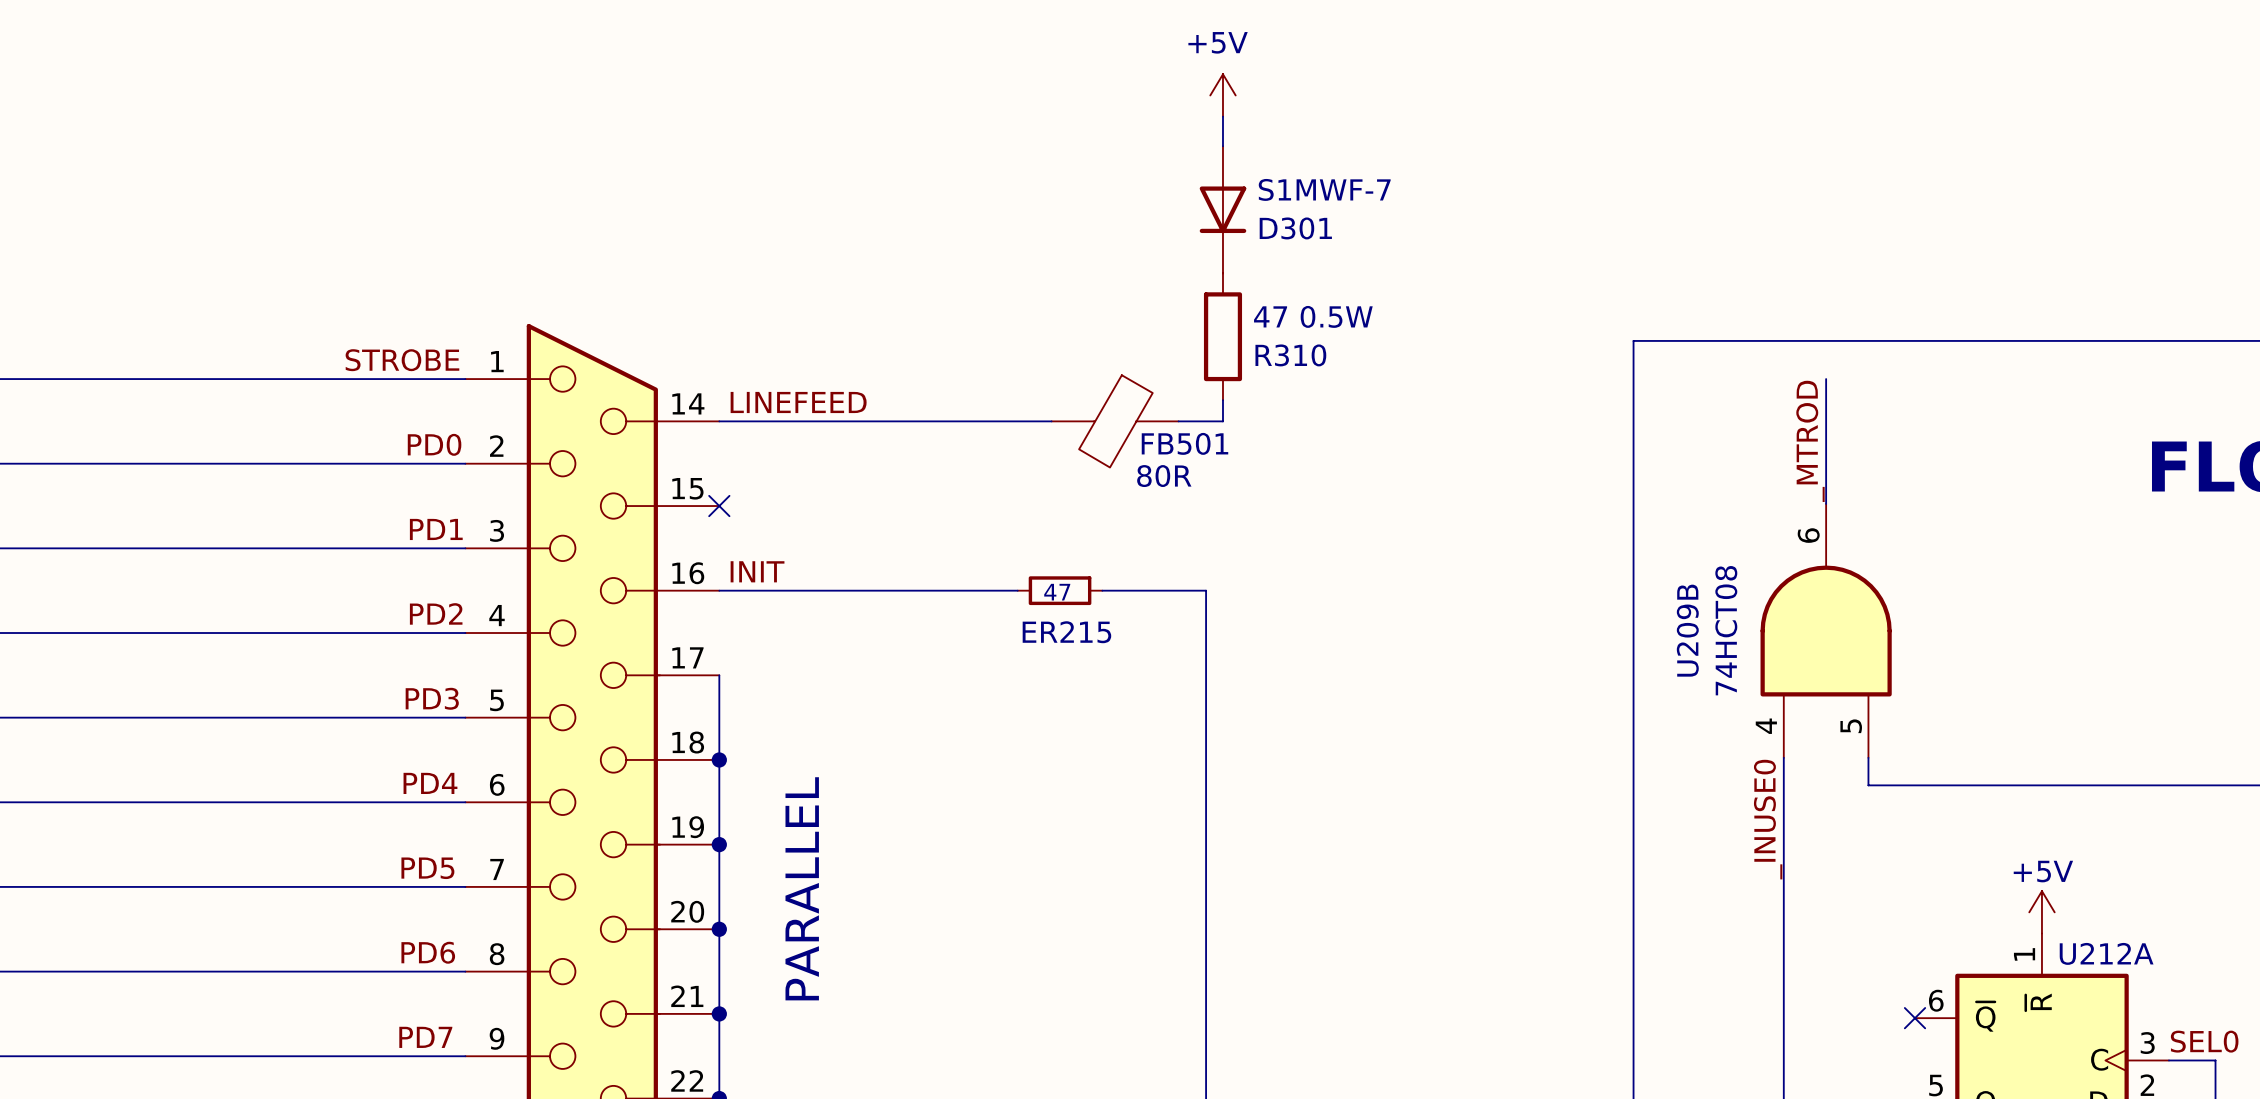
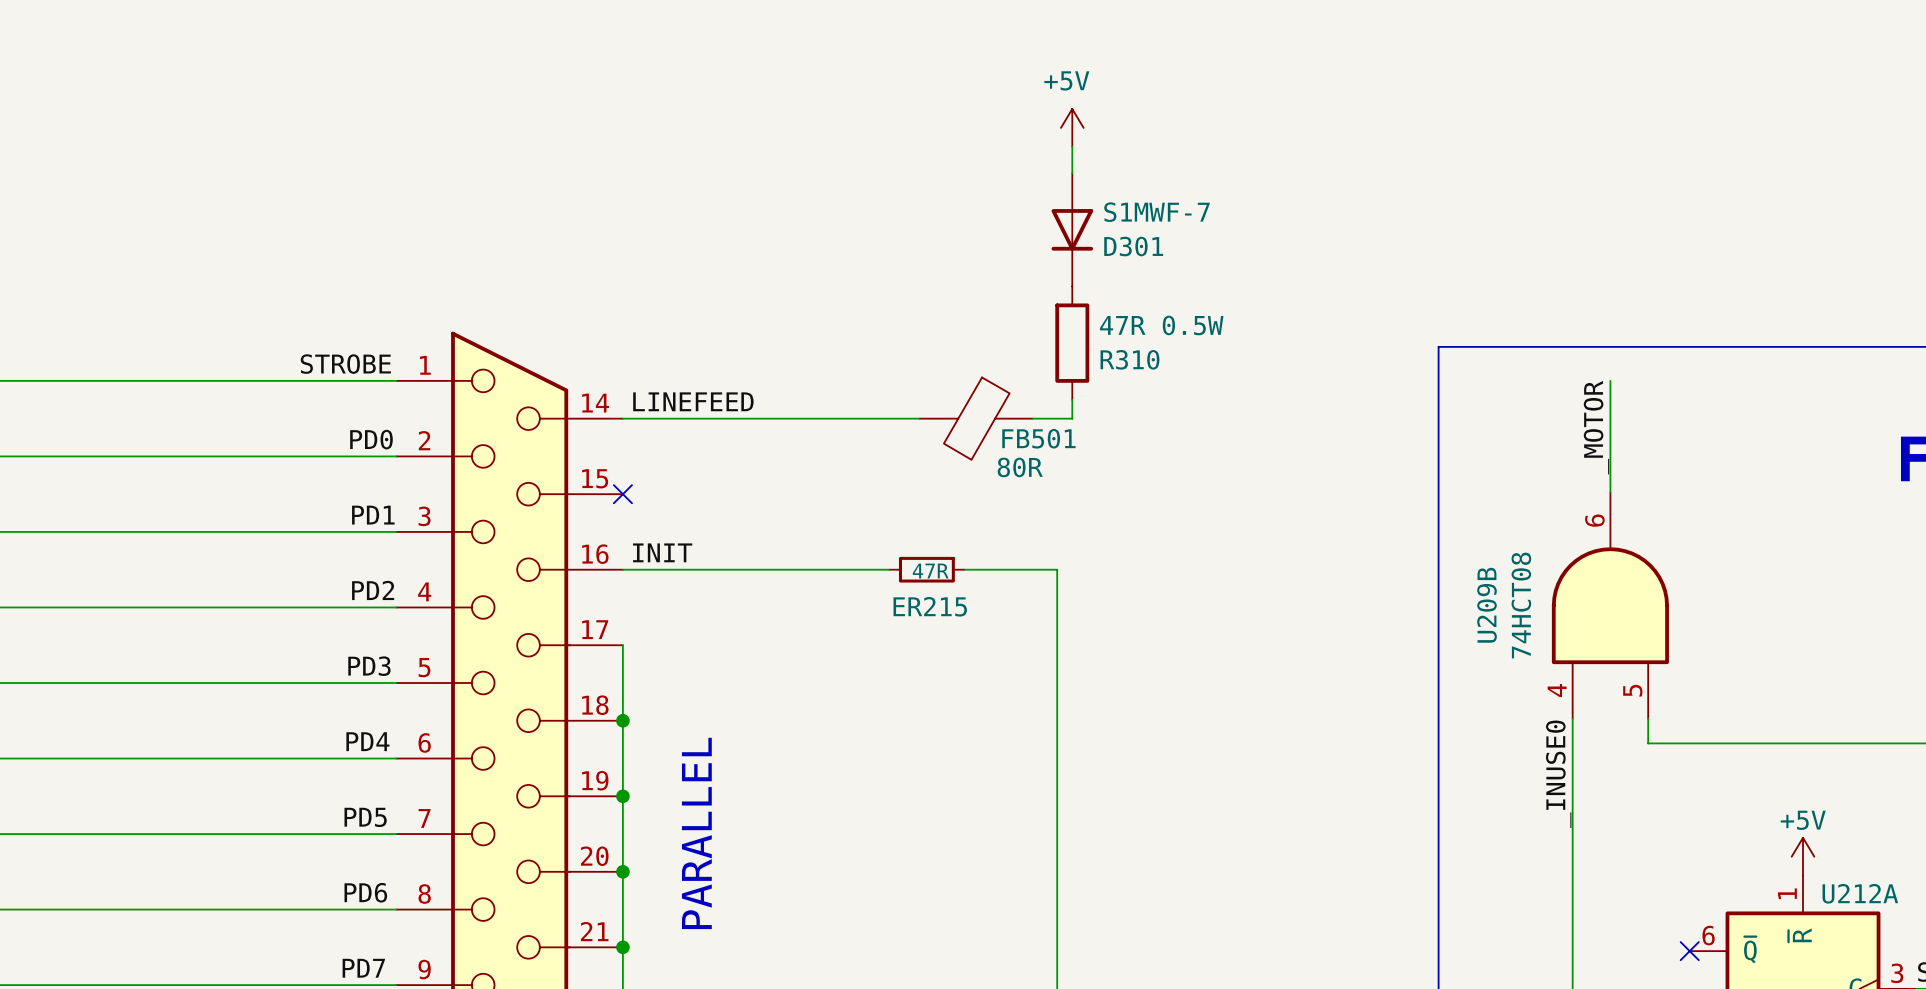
R310 value: 47 0.5W (1313, 316) -> 47R 0.5W (1161, 325)
label: _MTROD (1810, 441) -> _MOTOR (1596, 427)
ER215 value: 47 (1057, 592) -> 47R (930, 571)

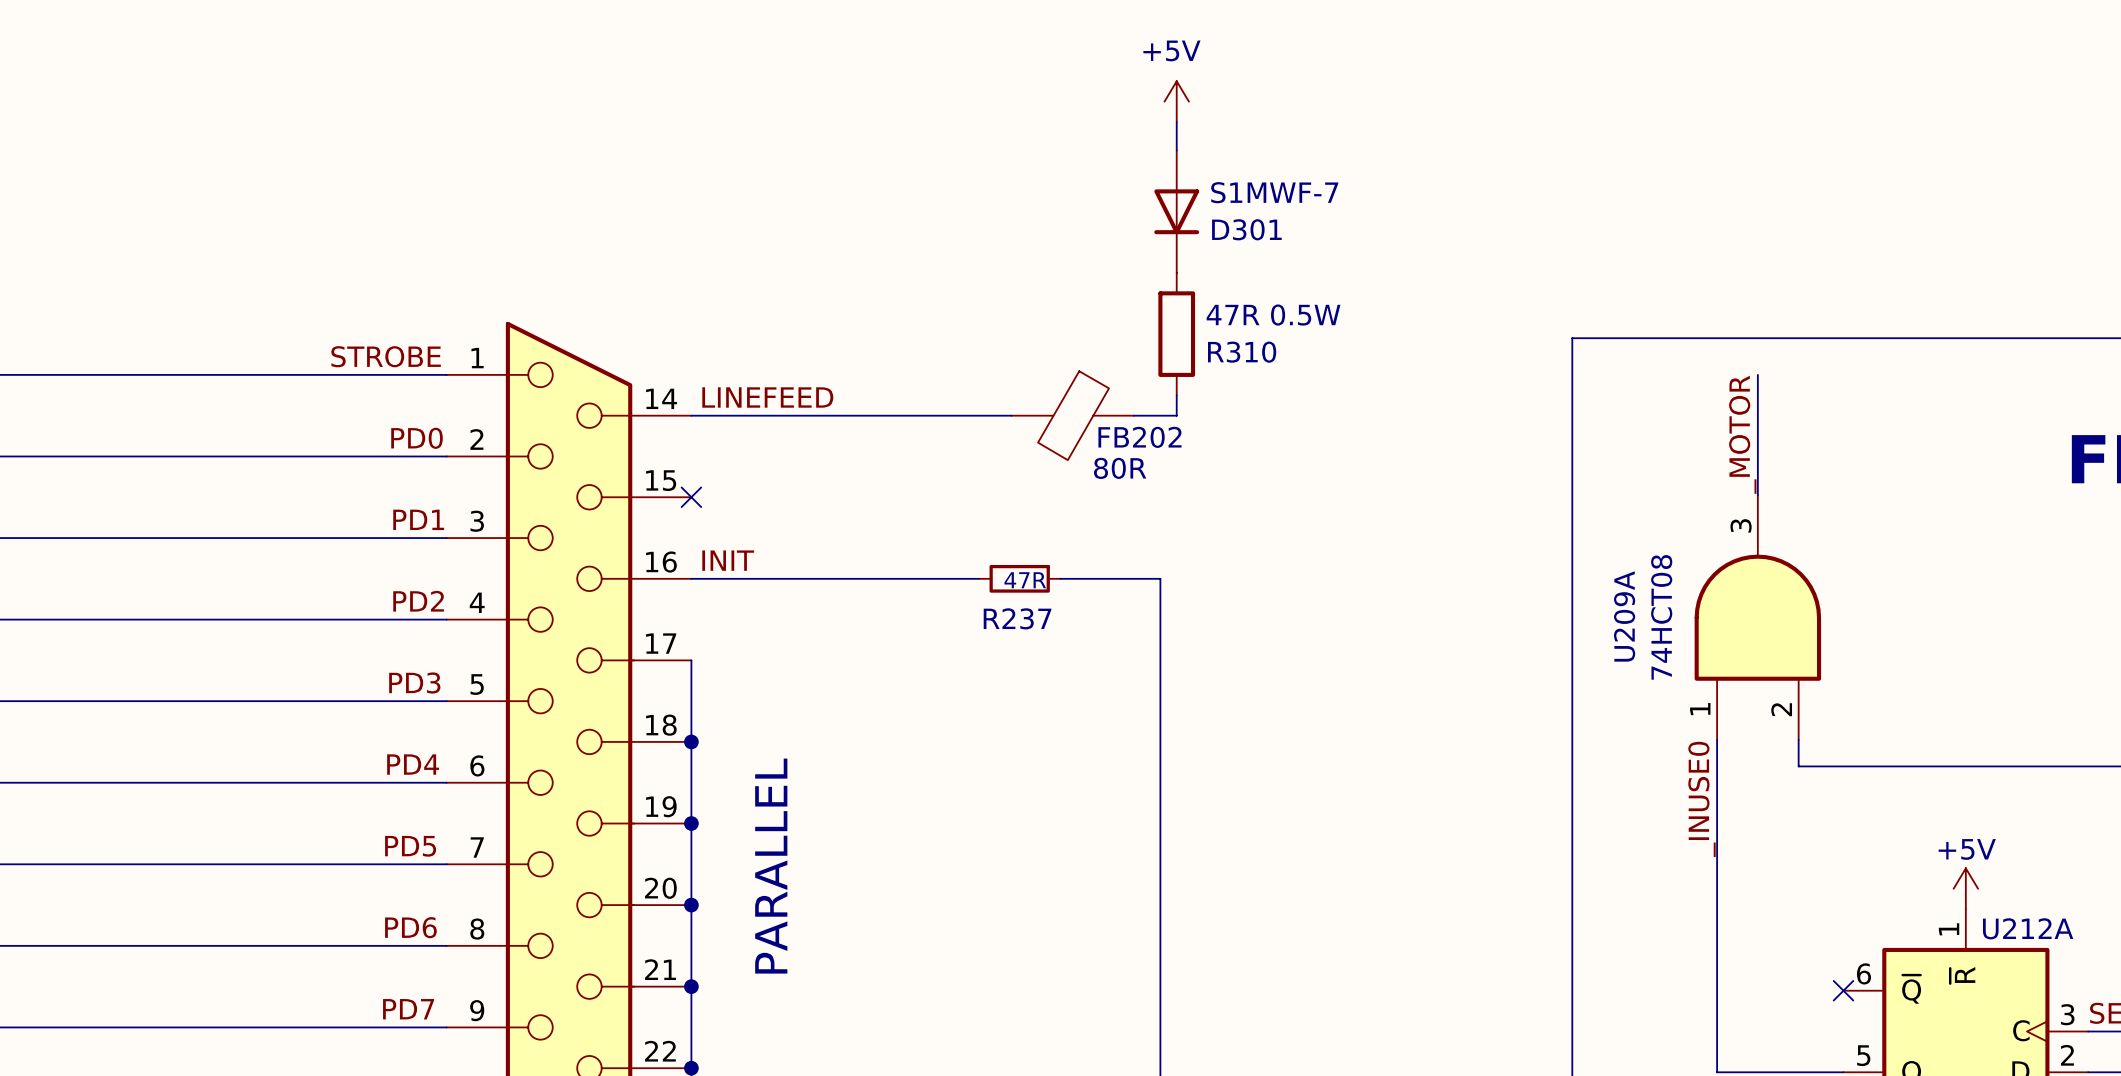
FB501 name: FB501 (1038, 438) -> FB202 (1139, 437)
U209B pin number: 6 (1594, 520) -> 3 (1741, 525)
U209B name: U209B (1486, 605) -> U209A (1624, 616)
ER215 name: ER215 (930, 606) -> R237 (1017, 618)
U209B pin number: 4 (1557, 690) -> 1 (1700, 709)
U209B pin number: 5 (1632, 690) -> 2 (1781, 709)

